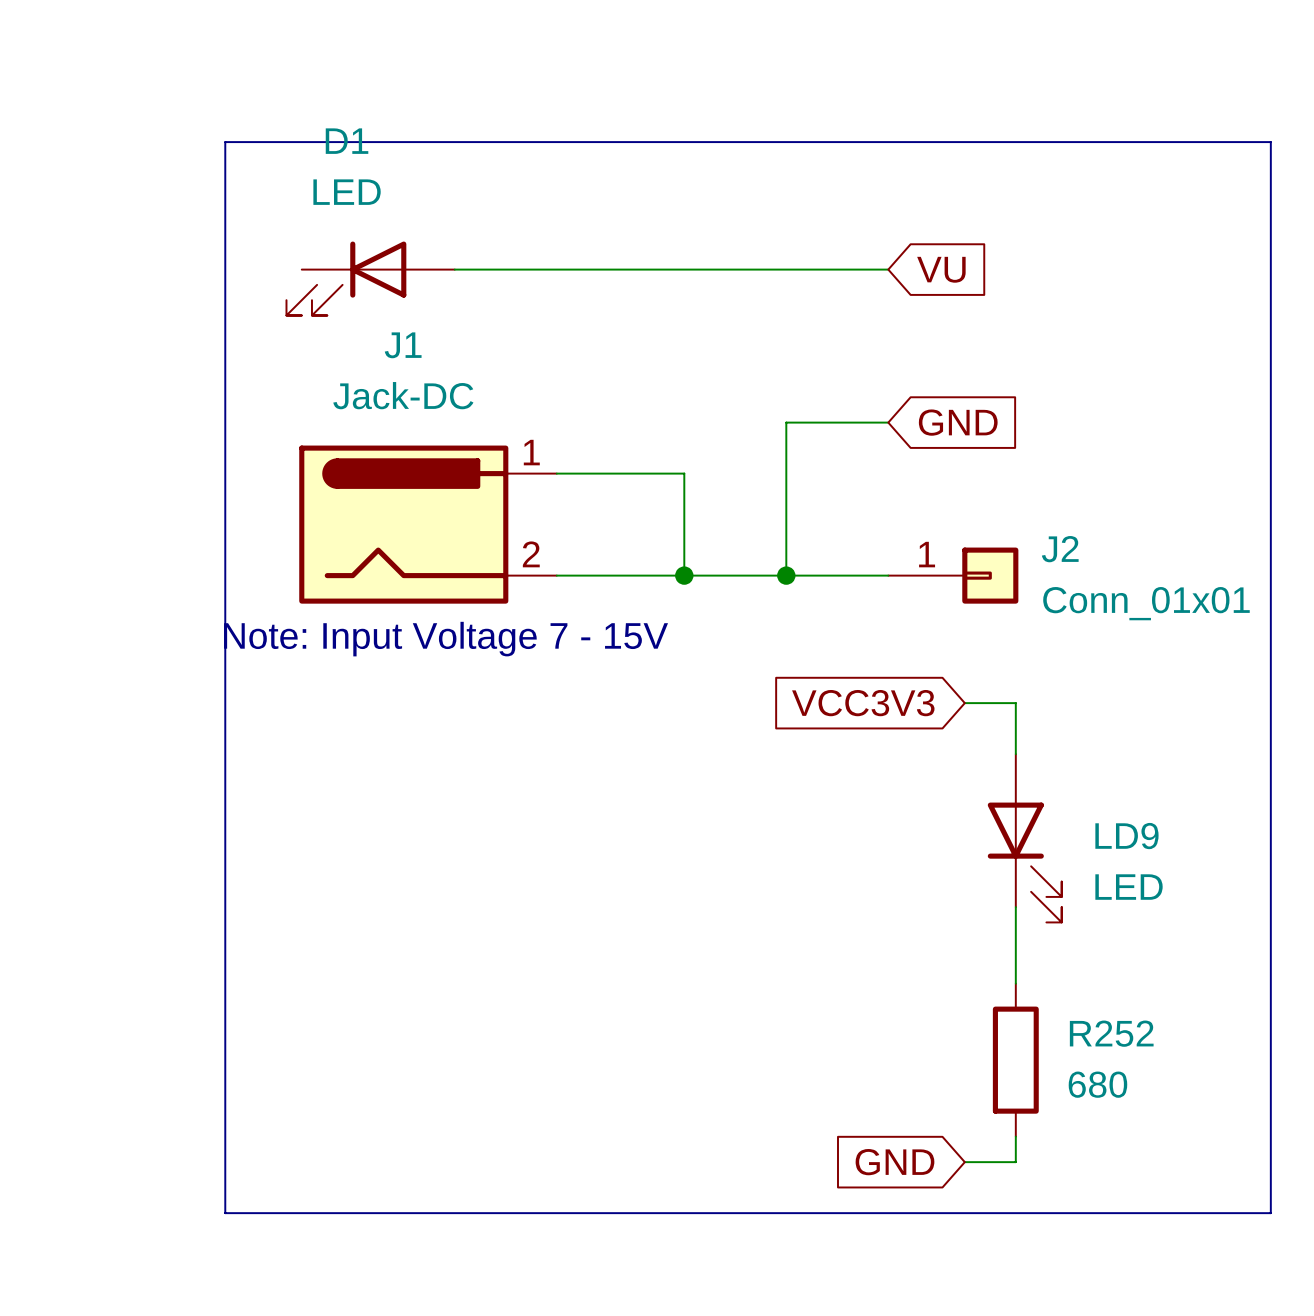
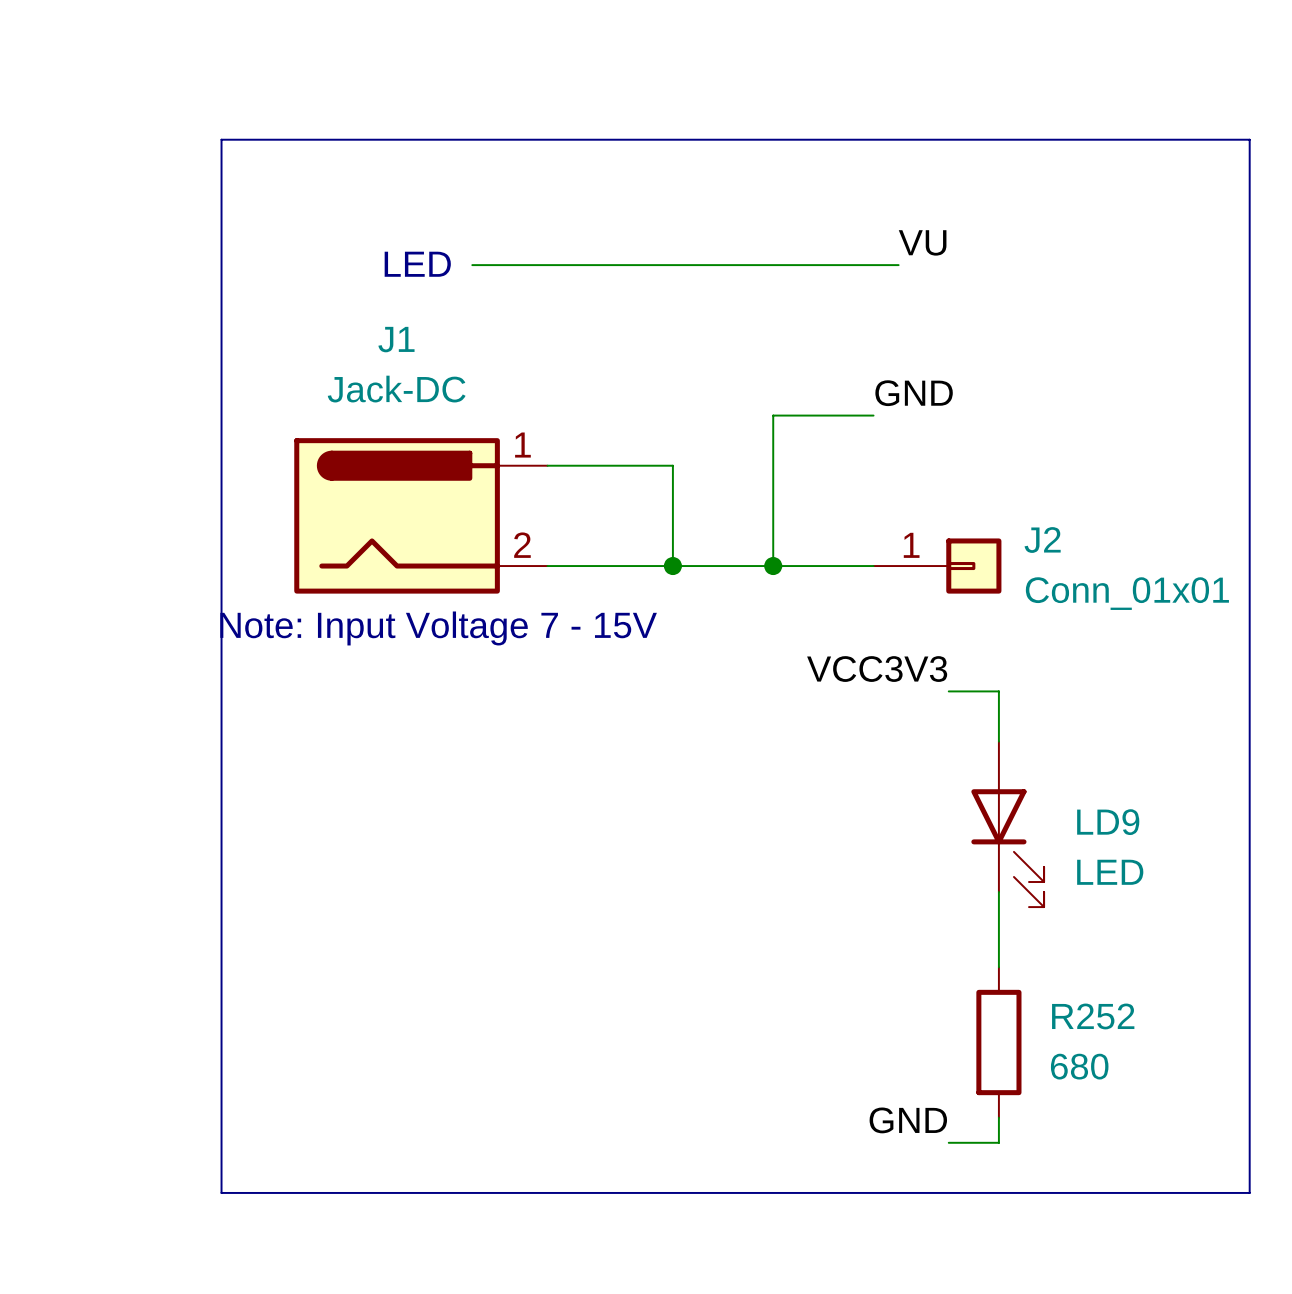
label: none -> VU (922, 242)
text: none -> LED (417, 264)
wire: (454, 269) (480, 269) -> (873, 265) (898, 265)
global label: VU (941, 269) -> none
D1: LED (370, 278) -> none
label: none -> GND (914, 393)
global label: GND (958, 422) -> none
label: none -> VCC3V3 (877, 669)
global label: VCC3V3 (863, 703) -> none
label: none -> GND (908, 1120)
global label: GND (894, 1162) -> none

